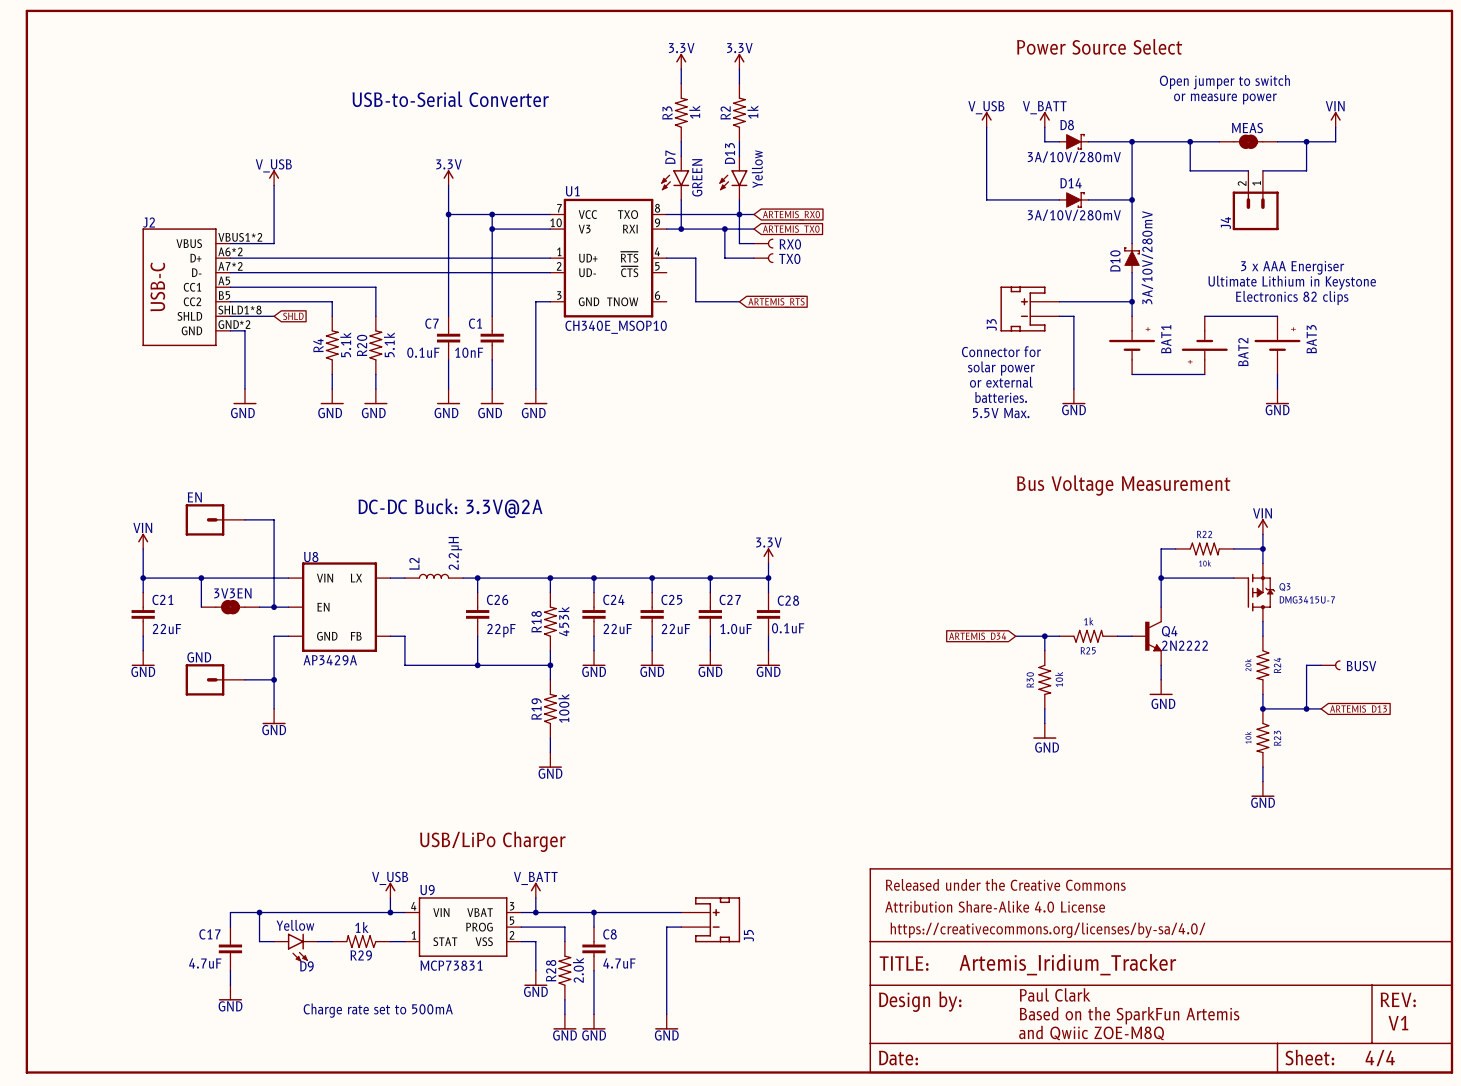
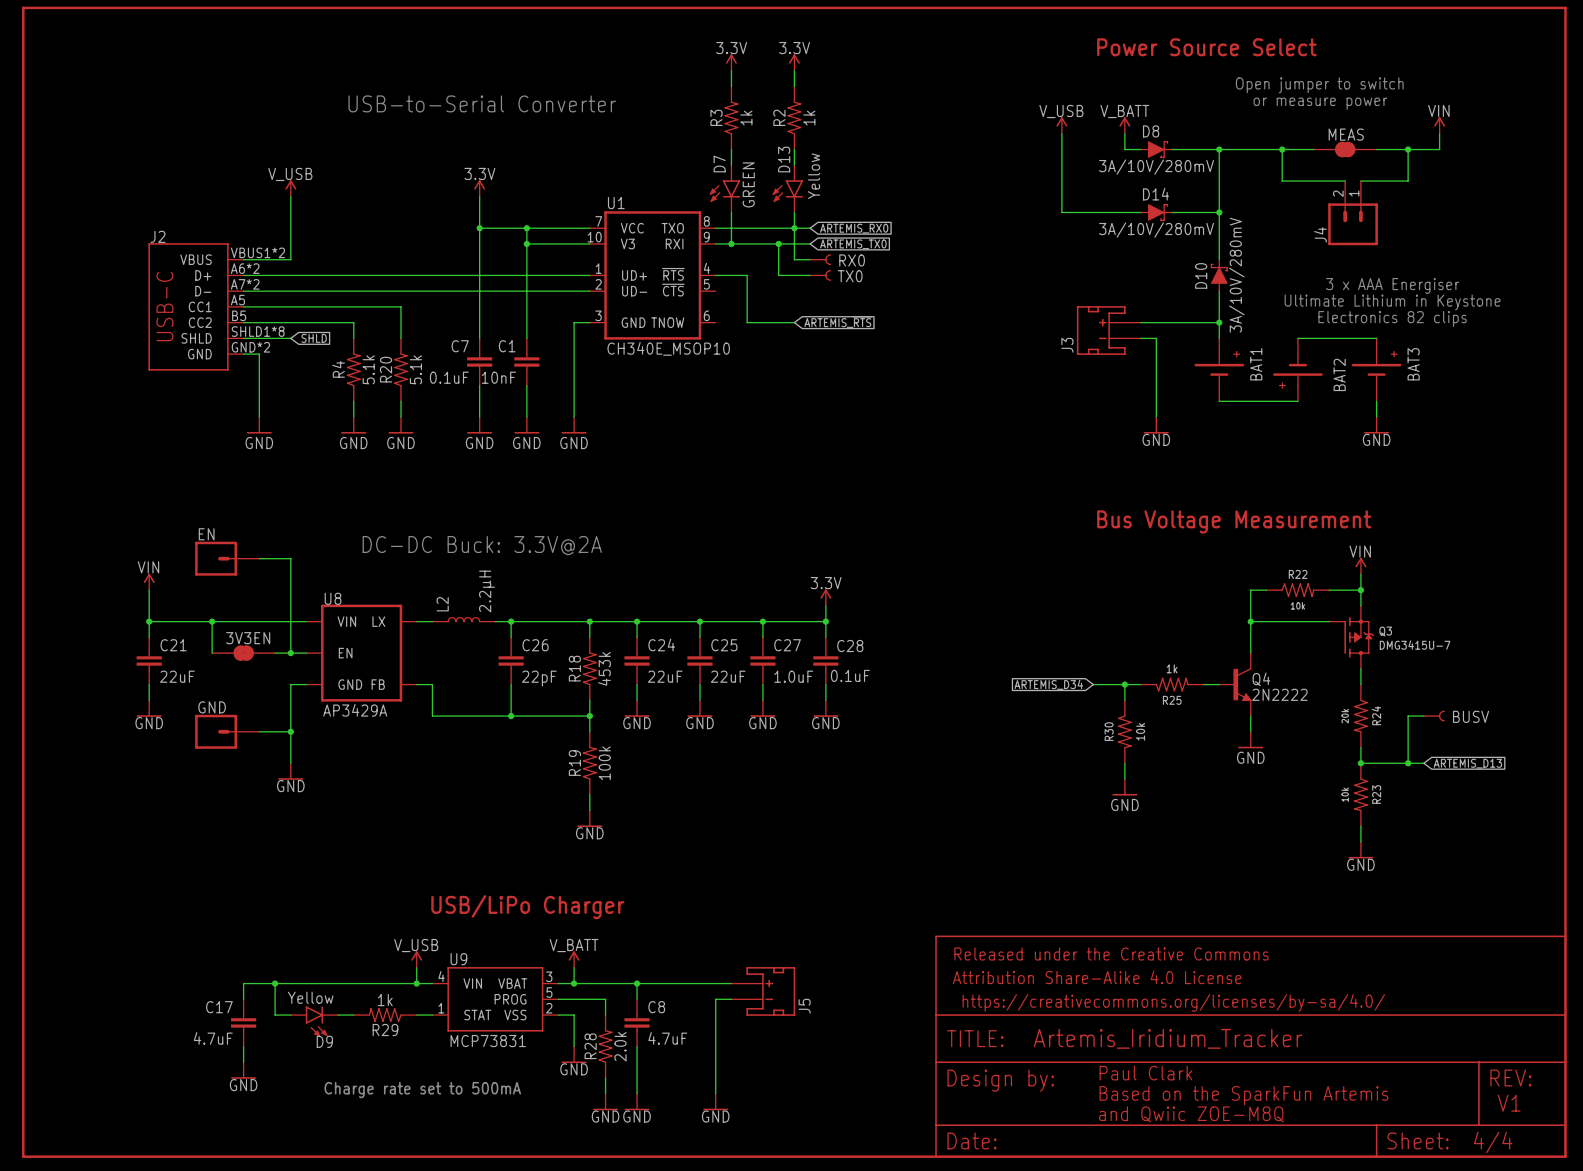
text: Connector for (1001, 351) -> none
text: solar power (1001, 368) -> none
text: or external (1001, 382) -> none
text: batteries. (1001, 397) -> none
text: 5.5V Max. (1001, 413) -> none

